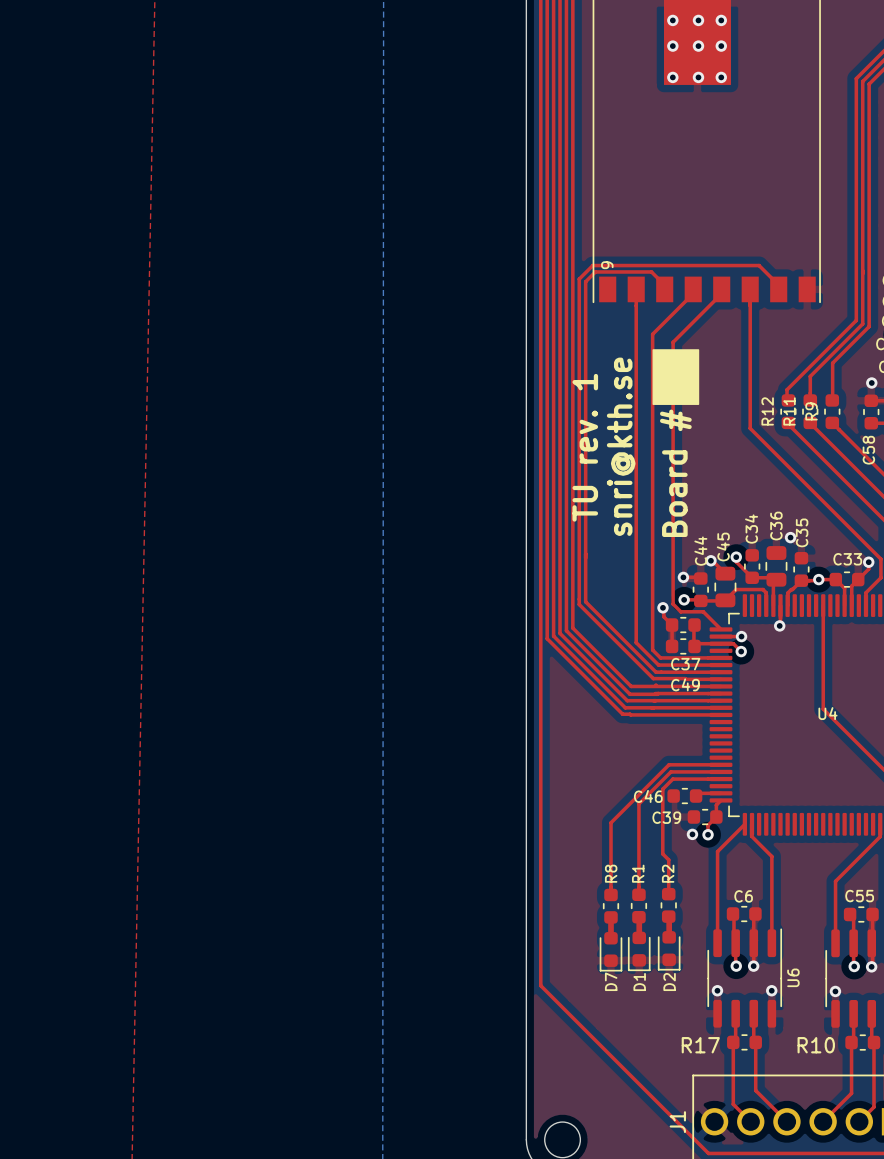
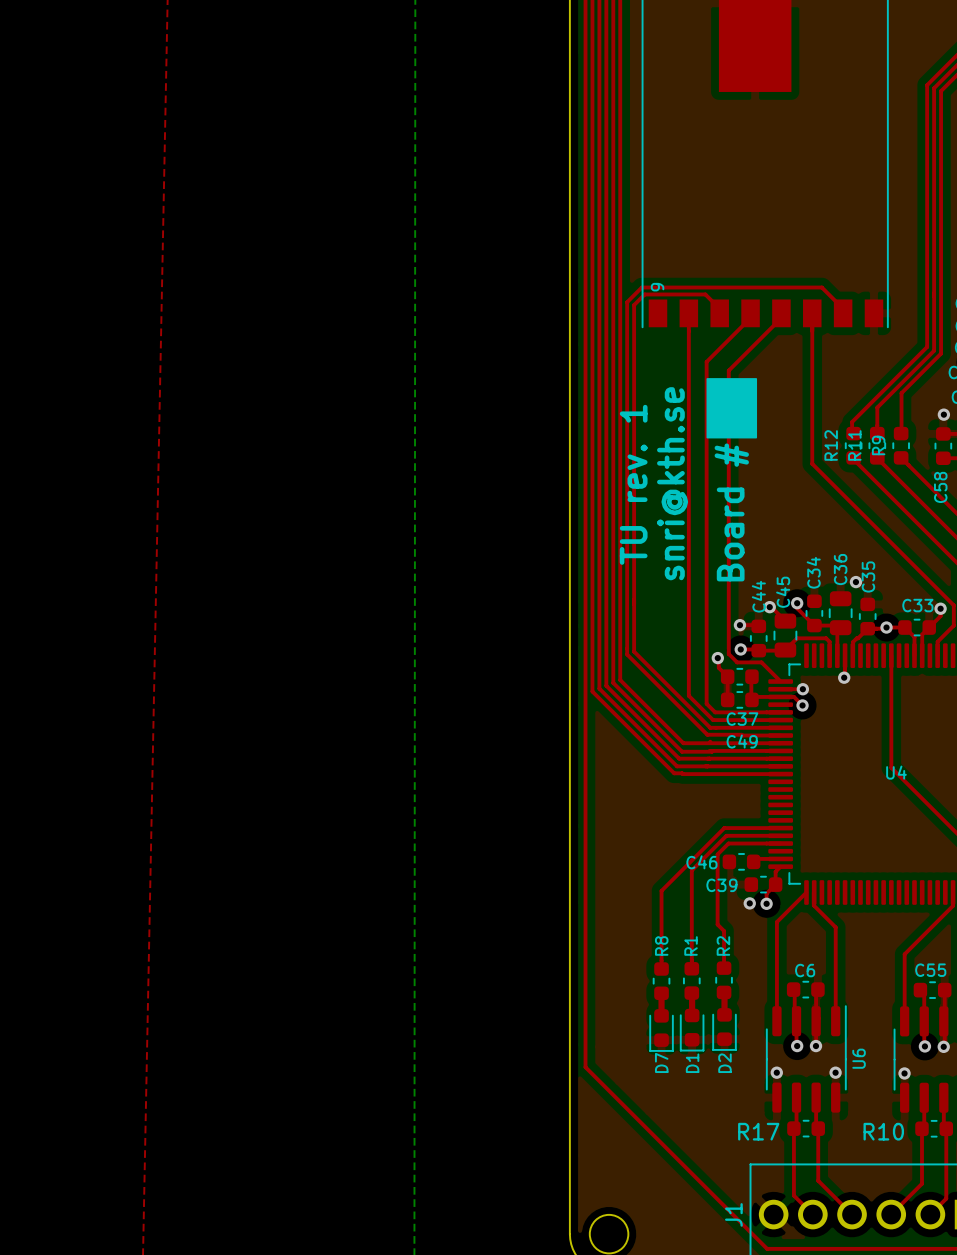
via: (672, 20) -> none
via: (698, 20) -> none
via: (721, 20) -> none
via: (672, 46) -> none
via: (698, 46) -> none
via: (721, 46) -> none
via: (672, 77) -> none
via: (698, 77) -> none
via: (721, 77) -> none

